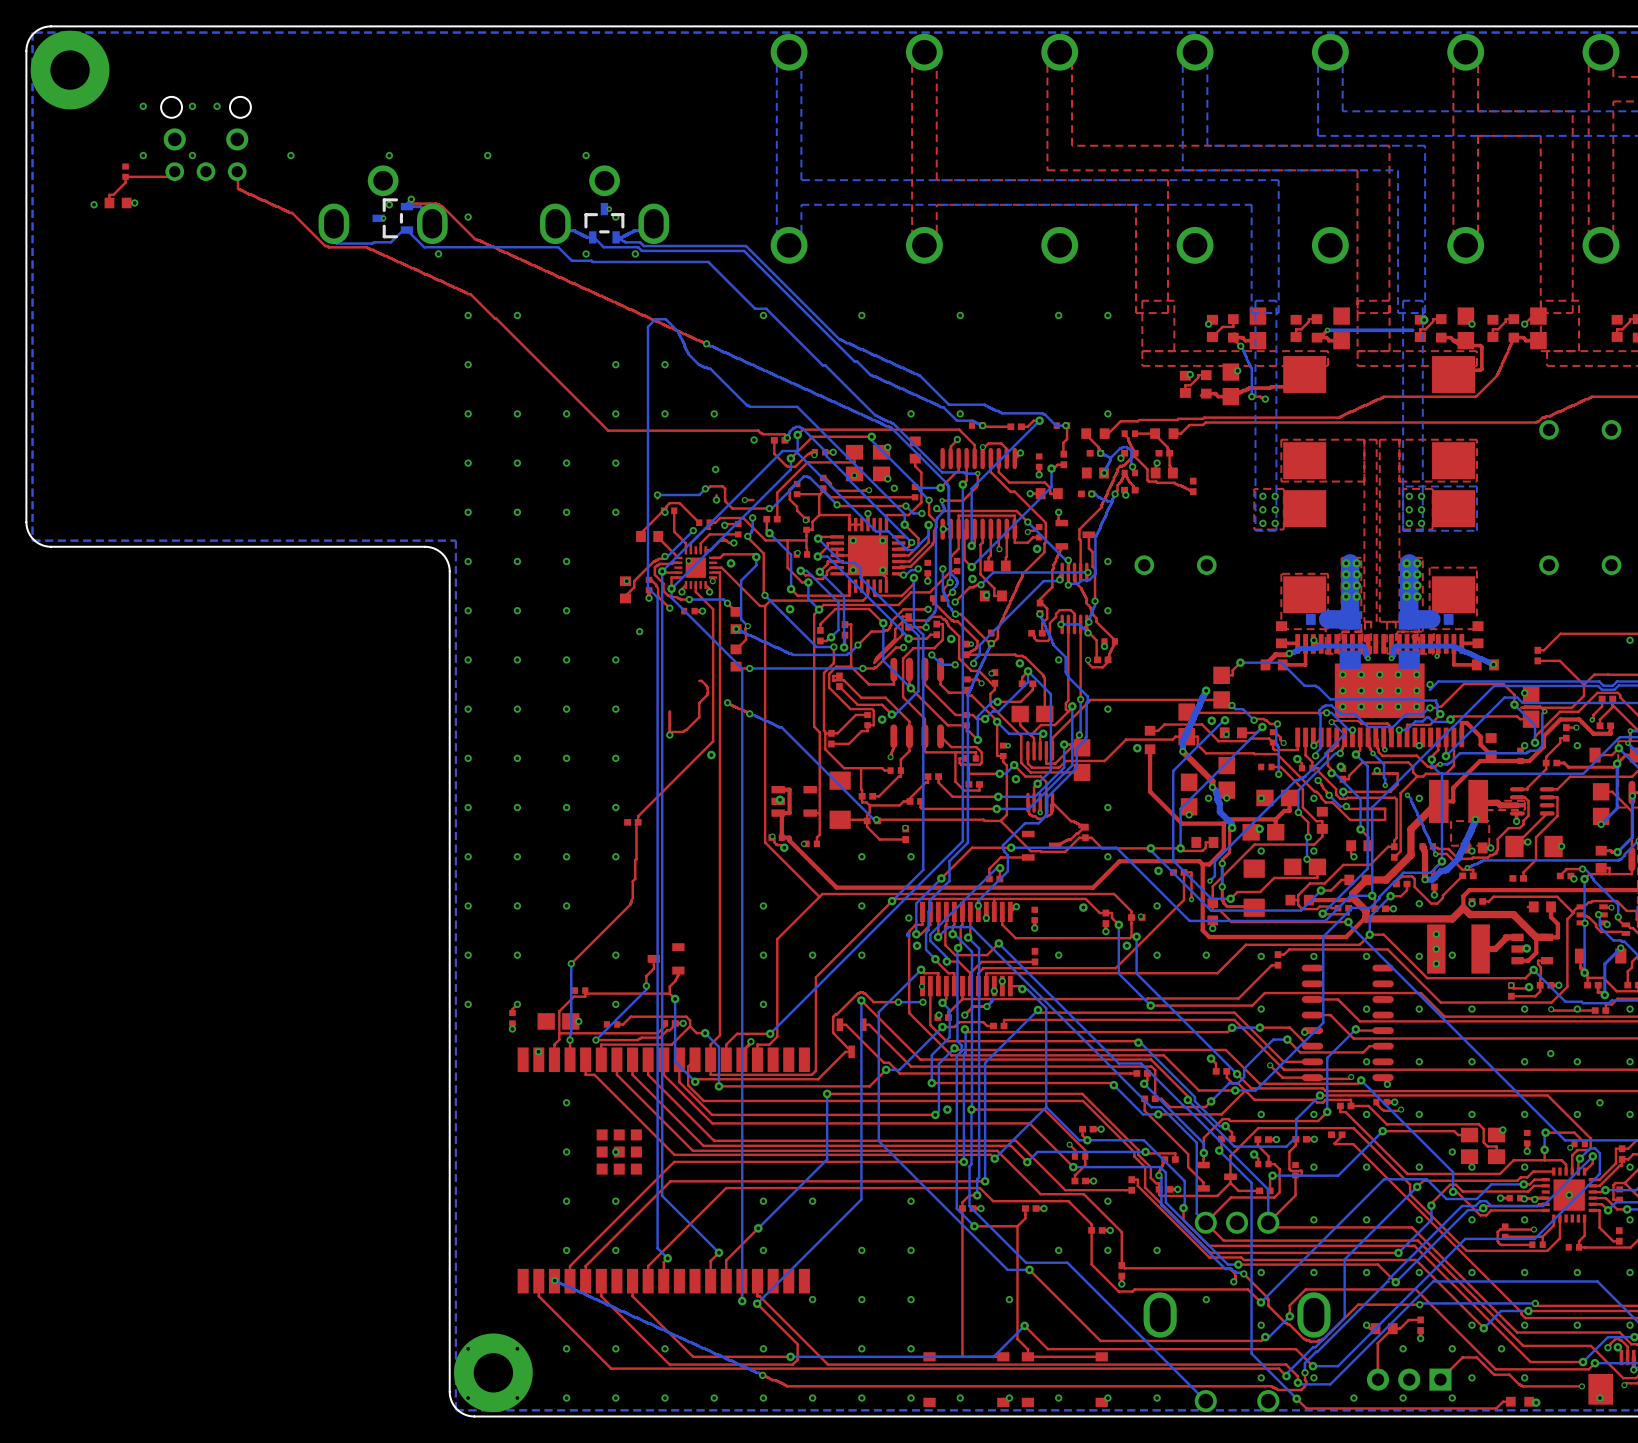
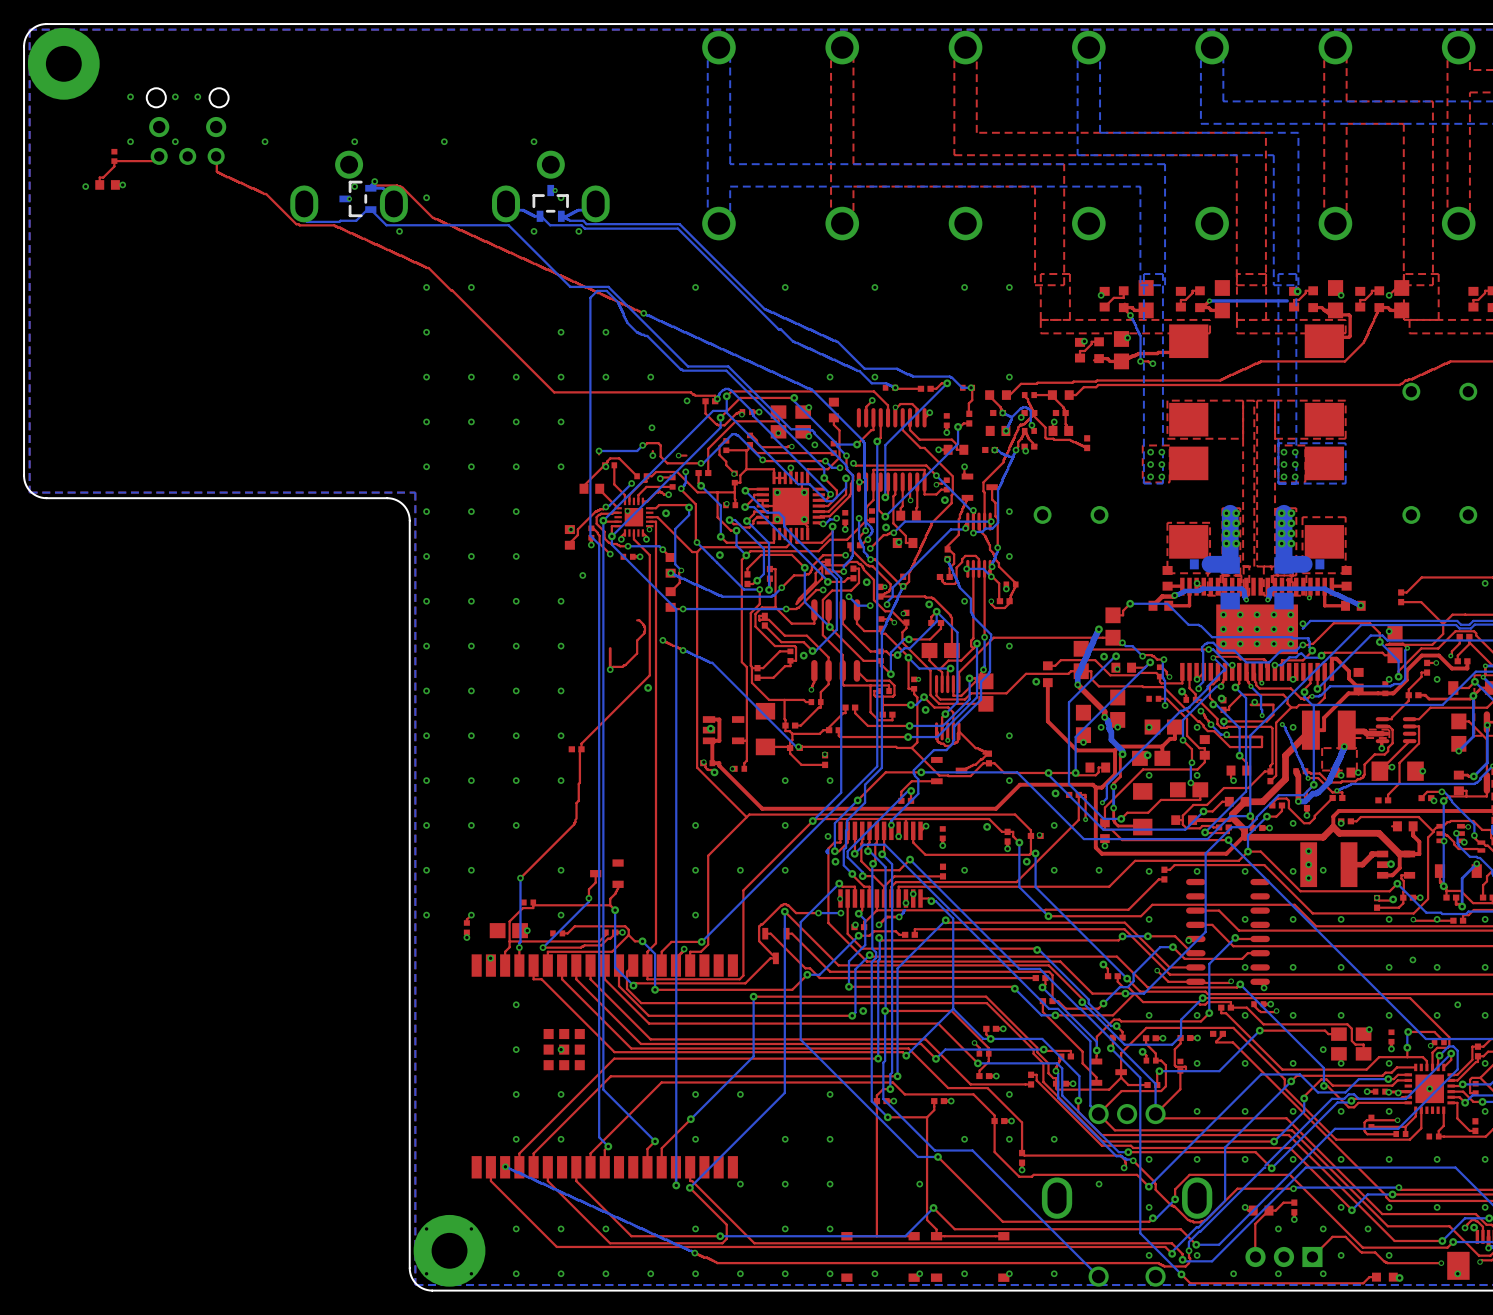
bottom track: (571, 260) (708, 261) (755, 308) (766, 308) (875, 415) (892, 423) (942, 472) (977, 473) -> (521, 237) (570, 286) (608, 286) (688, 366) (728, 366) (791, 429) (812, 430) (846, 465) (847, 469) (852, 475)
top track: (977, 473) (976, 487) (963, 500) (942, 500) -> none
via: (977, 473) -> none
bottom track: (942, 500) (944, 509) (935, 521) -> none
via: (942, 500) -> none

